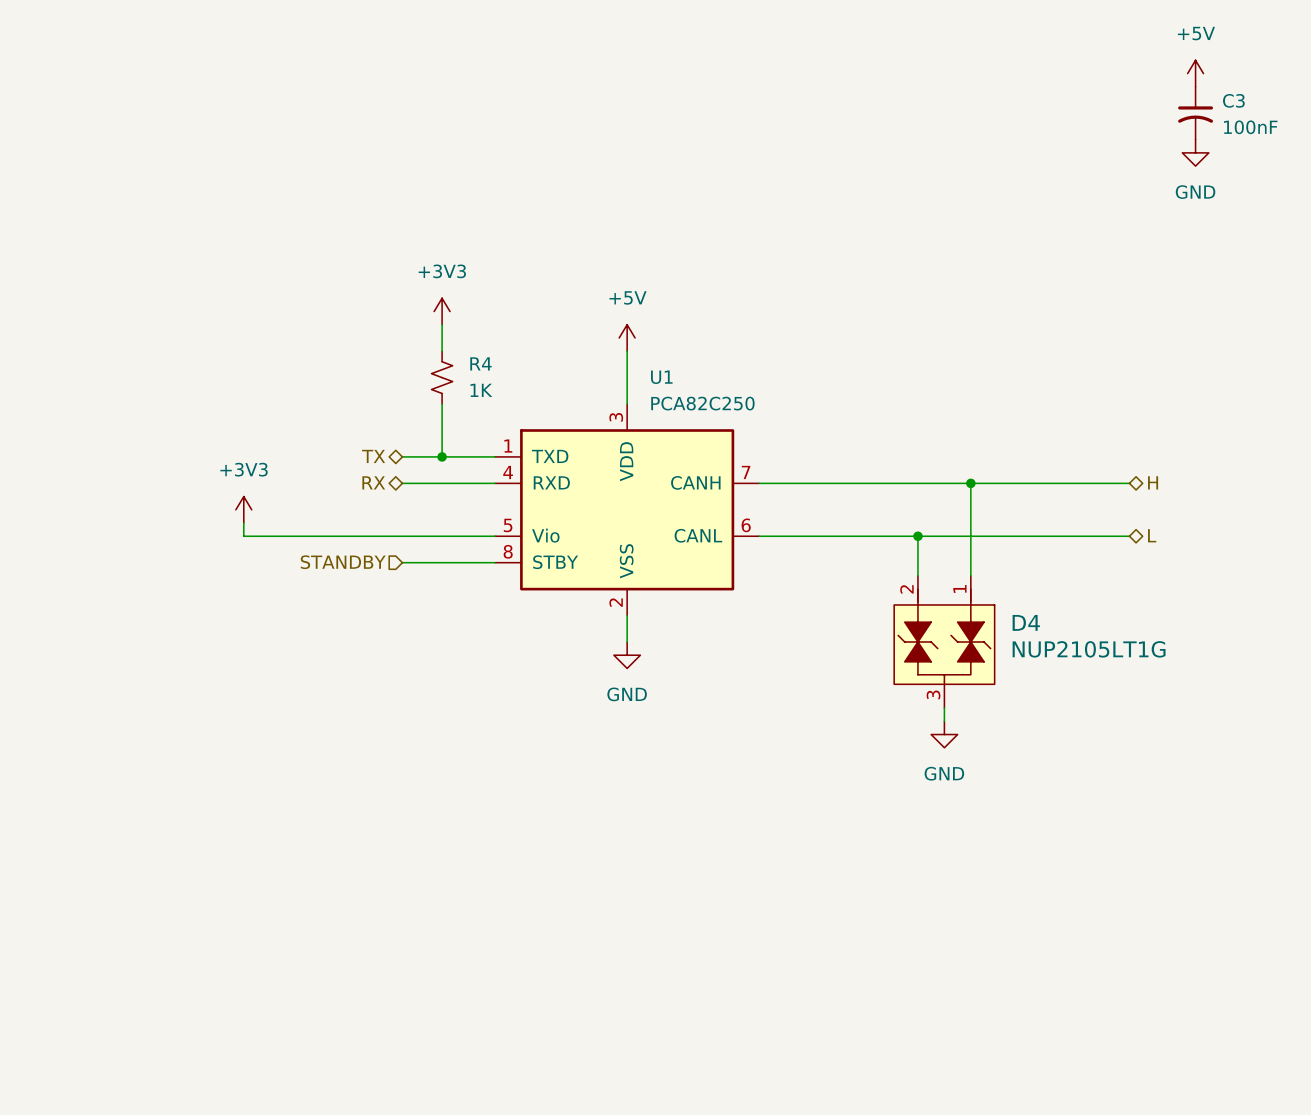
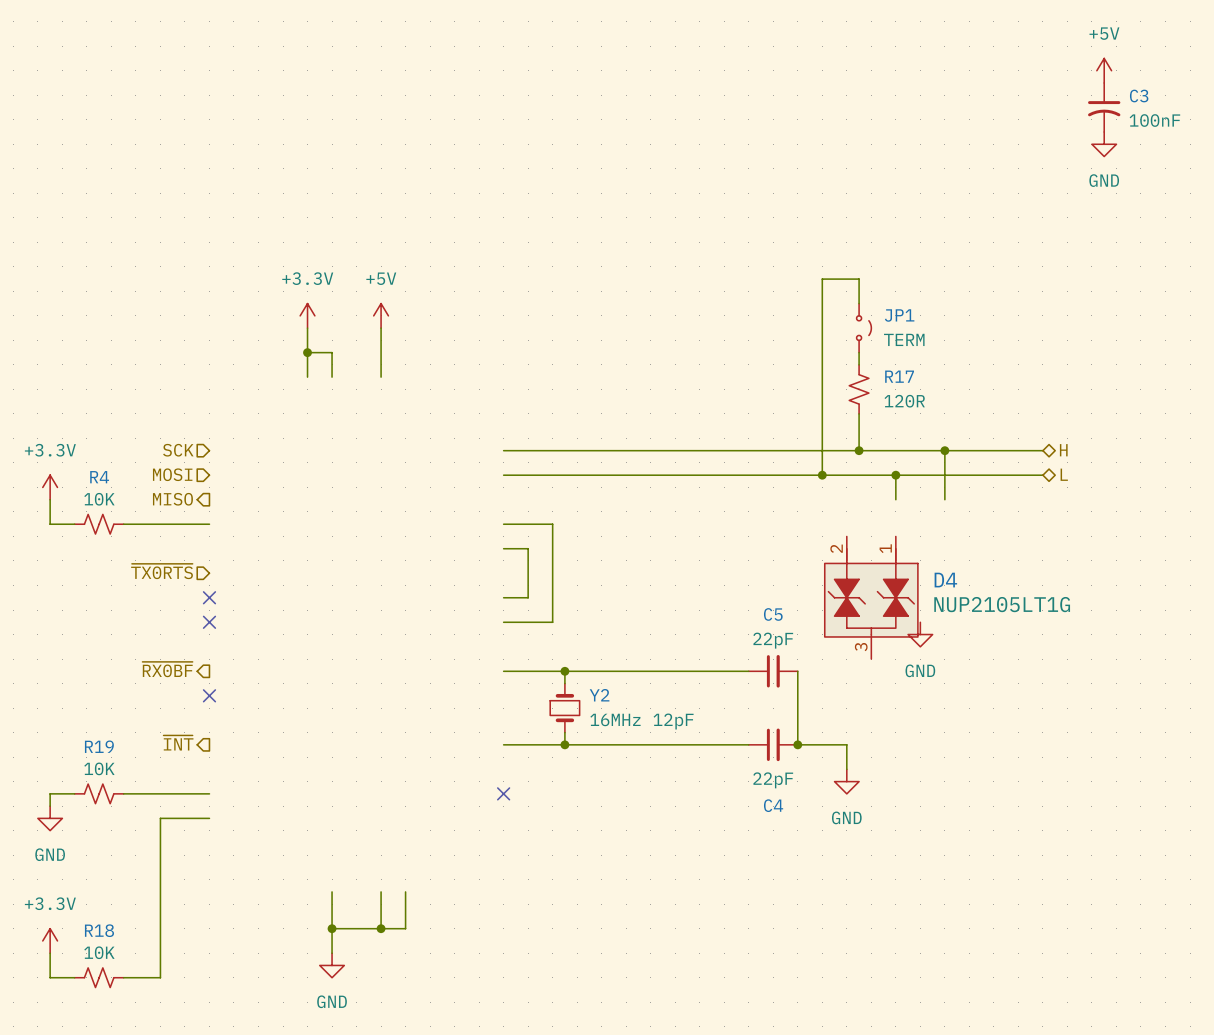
power symbol: +3V3 (442, 311) -> none
wire: (442, 324) (442, 351) -> none
wire: none -> (859, 303) (859, 279) (822, 279) (822, 475)
power symbol: none -> +3.3V (307, 315)
power symbol position: +5V (627, 337) -> +5V (381, 315)
wire: none -> (307, 328) (307, 377)
wire: (627, 351) (627, 404) -> none
JP1: none -> TERM (863, 328)
R4 name position: R4 (480, 363) -> R4 (99, 477)
wire: none -> (307, 352) (332, 352) (332, 377)
junction: none -> (307, 352)
R4 rotation: 0° (442, 377) -> 90° clockwise (99, 524)
R4 position: (442, 377) -> (99, 524)
wire: none -> (859, 352) (859, 364)
R4 value: 1K (481, 390) -> 10K (99, 499)
wire: (442, 404) (442, 456) -> (381, 328) (381, 377)
R17: none -> 120R (859, 389)
hierarchical label: TX (373, 456) -> none
wire: (402, 456) (494, 456) -> none
junction: (442, 456) -> none
hierarchical label: none -> SCK (178, 450)
hierarchical label: RX (373, 482) -> none
wire: (402, 483) (494, 483) -> none
junction: none -> (859, 450)
wire: (970, 483) (970, 509) -> none
junction: (970, 483) -> none
wire: none -> (944, 450) (944, 499)
junction: none -> (944, 450)
hierarchical label: none -> MOSI (172, 474)
power symbol: +3V3 (243, 509) -> none
wire: none -> (503, 475) (1042, 475)
U1: PCA82C250 (627, 509) -> none
junction: none -> (822, 475)
junction: none -> (895, 475)
power symbol: none -> +3.3V (50, 487)
wire: (243, 523) (243, 536) (494, 536) -> none
hierarchical label: none -> MISO (172, 499)
hierarchical label position: L (1152, 535) -> L (1064, 474)
wire: none -> (50, 499) (50, 524) (74, 524)
wire: (759, 536) (1129, 536) -> none
wire: (917, 536) (917, 575) -> (859, 413) (859, 450)
junction: (917, 536) -> none
wire: (970, 536) (970, 575) -> none
wire: none -> (123, 524) (209, 524)
hierarchical label: STANDBY (343, 562) -> none
wire: (402, 562) (494, 562) -> none
wire: none -> (503, 524) (552, 524) (552, 622) (503, 622)
wire: none -> (503, 548) (528, 548) (528, 597) (503, 597)
hierarchical label: none -> ~{TX0RTS} (162, 571)
wire: (627, 615) (627, 642) -> none
no-connect mark: none -> (209, 597)
power symbol: GND (627, 655) -> none
no-connect mark: none -> (209, 622)
power symbol: none -> GND (920, 634)
wire: (944, 708) (944, 721) -> none
hierarchical label: none -> ~{RX0BF} (167, 669)
wire: none -> (503, 671) (748, 671)
wire: none -> (564, 671) (564, 683)
junction: none -> (564, 671)
C5: none -> 22pF (773, 671)
wire: none -> (797, 671) (797, 744) (846, 744) (846, 769)
power symbol: GND (944, 734) -> none
no-connect mark: none -> (209, 695)
Y2: none -> 16MHz 12pF (564, 708)
wire: none -> (564, 732) (564, 744)
hierarchical label: none -> ~{INT} (178, 742)
wire: none -> (503, 744) (748, 744)
junction: none -> (564, 744)
C4: none -> 22pF (773, 744)
junction: none -> (797, 744)
power symbol: none -> GND (846, 781)
wire: none -> (74, 793) (50, 793) (50, 806)
R19: none -> 10K (99, 793)
wire: none -> (123, 793) (209, 793)
no-connect mark: none -> (503, 793)
power symbol: none -> GND (50, 818)
wire: none -> (209, 818) (160, 818) (160, 977) (123, 977)
wire: none -> (332, 891) (332, 953)
wire: none -> (381, 891) (381, 928)
wire: none -> (405, 891) (405, 928) (332, 928)
junction: none -> (332, 928)
junction: none -> (381, 928)
power symbol: none -> +3.3V (50, 940)
wire: none -> (50, 953) (50, 977) (74, 977)
power symbol: none -> GND (332, 965)
R18: none -> 10K (99, 977)

